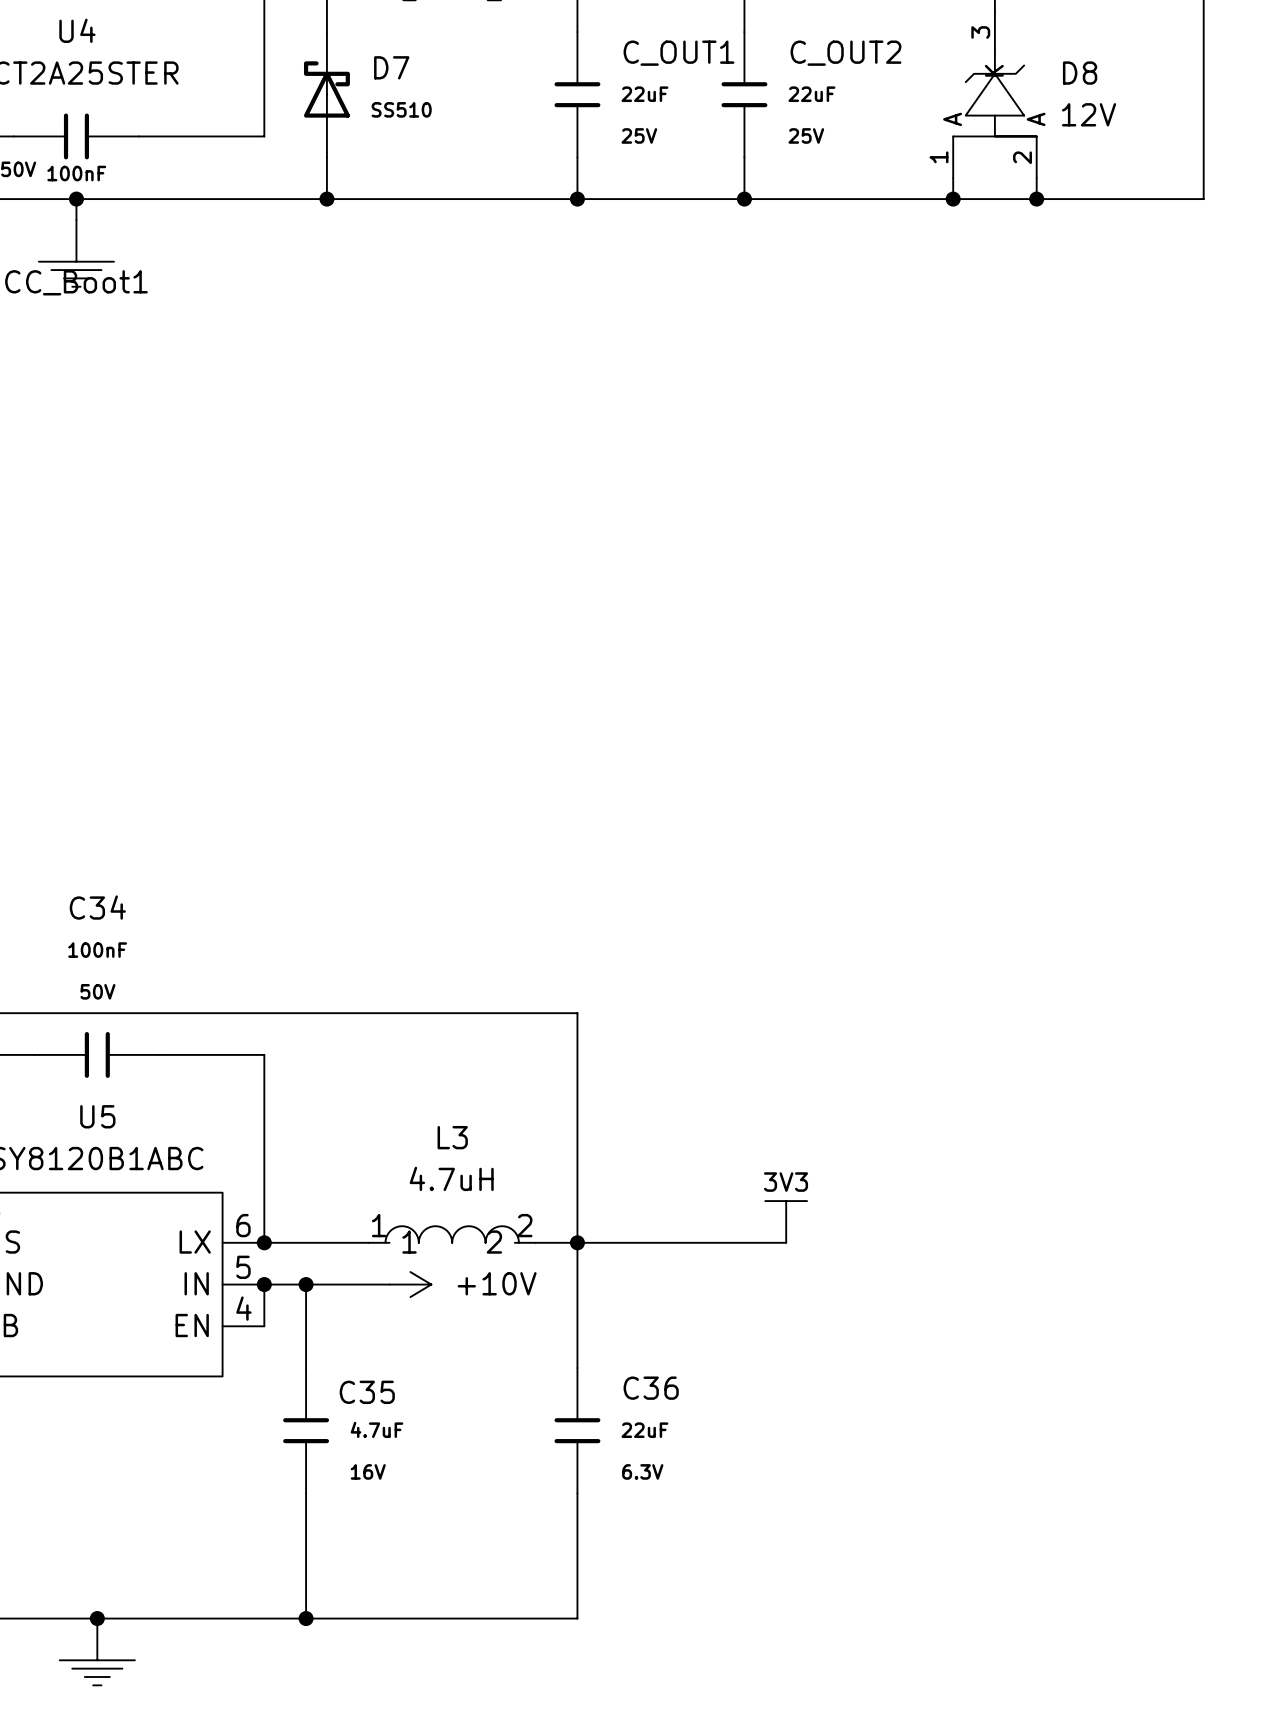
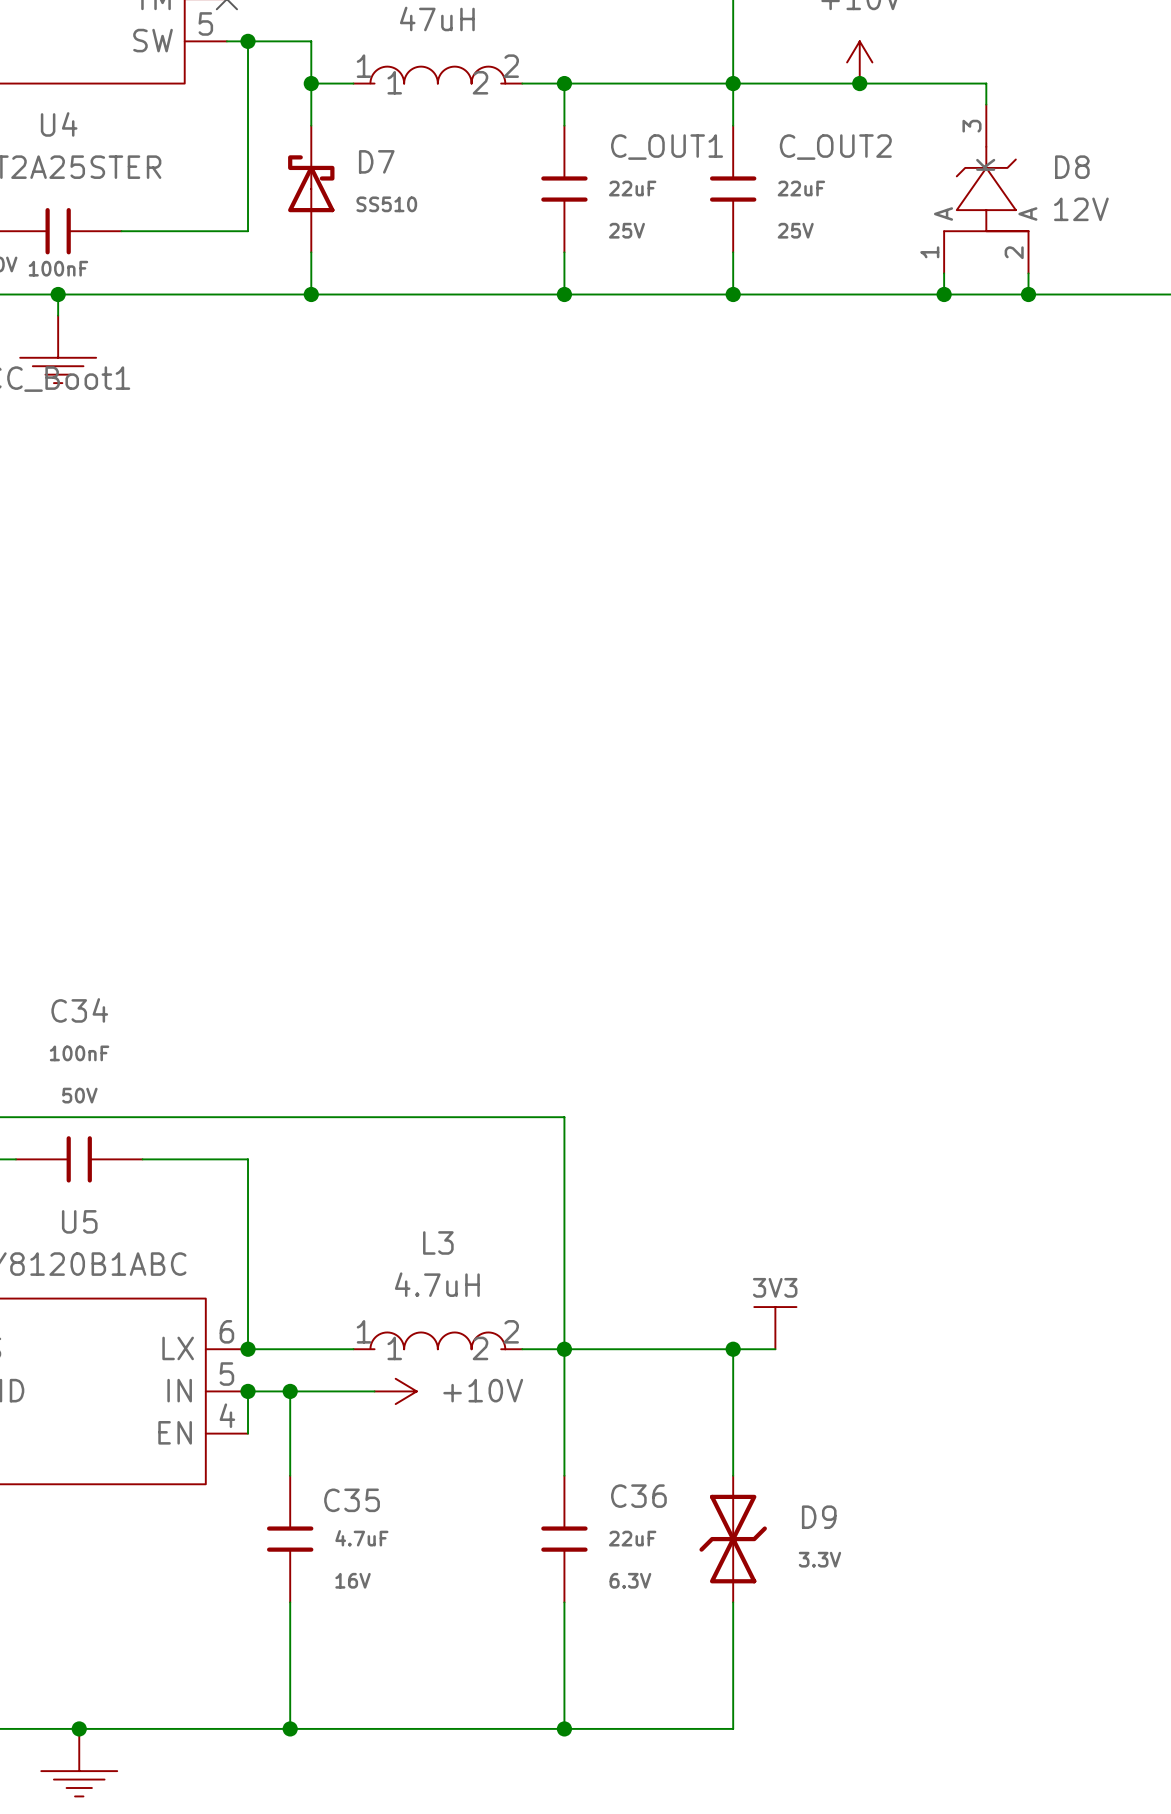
wire: none -> (733, 1349) (733, 1475)
junction: none -> (733, 1349)
D9: none -> 3.3V (733, 1539)
wire: none -> (733, 1602) (733, 1728) (564, 1728)
junction: none -> (564, 1728)

